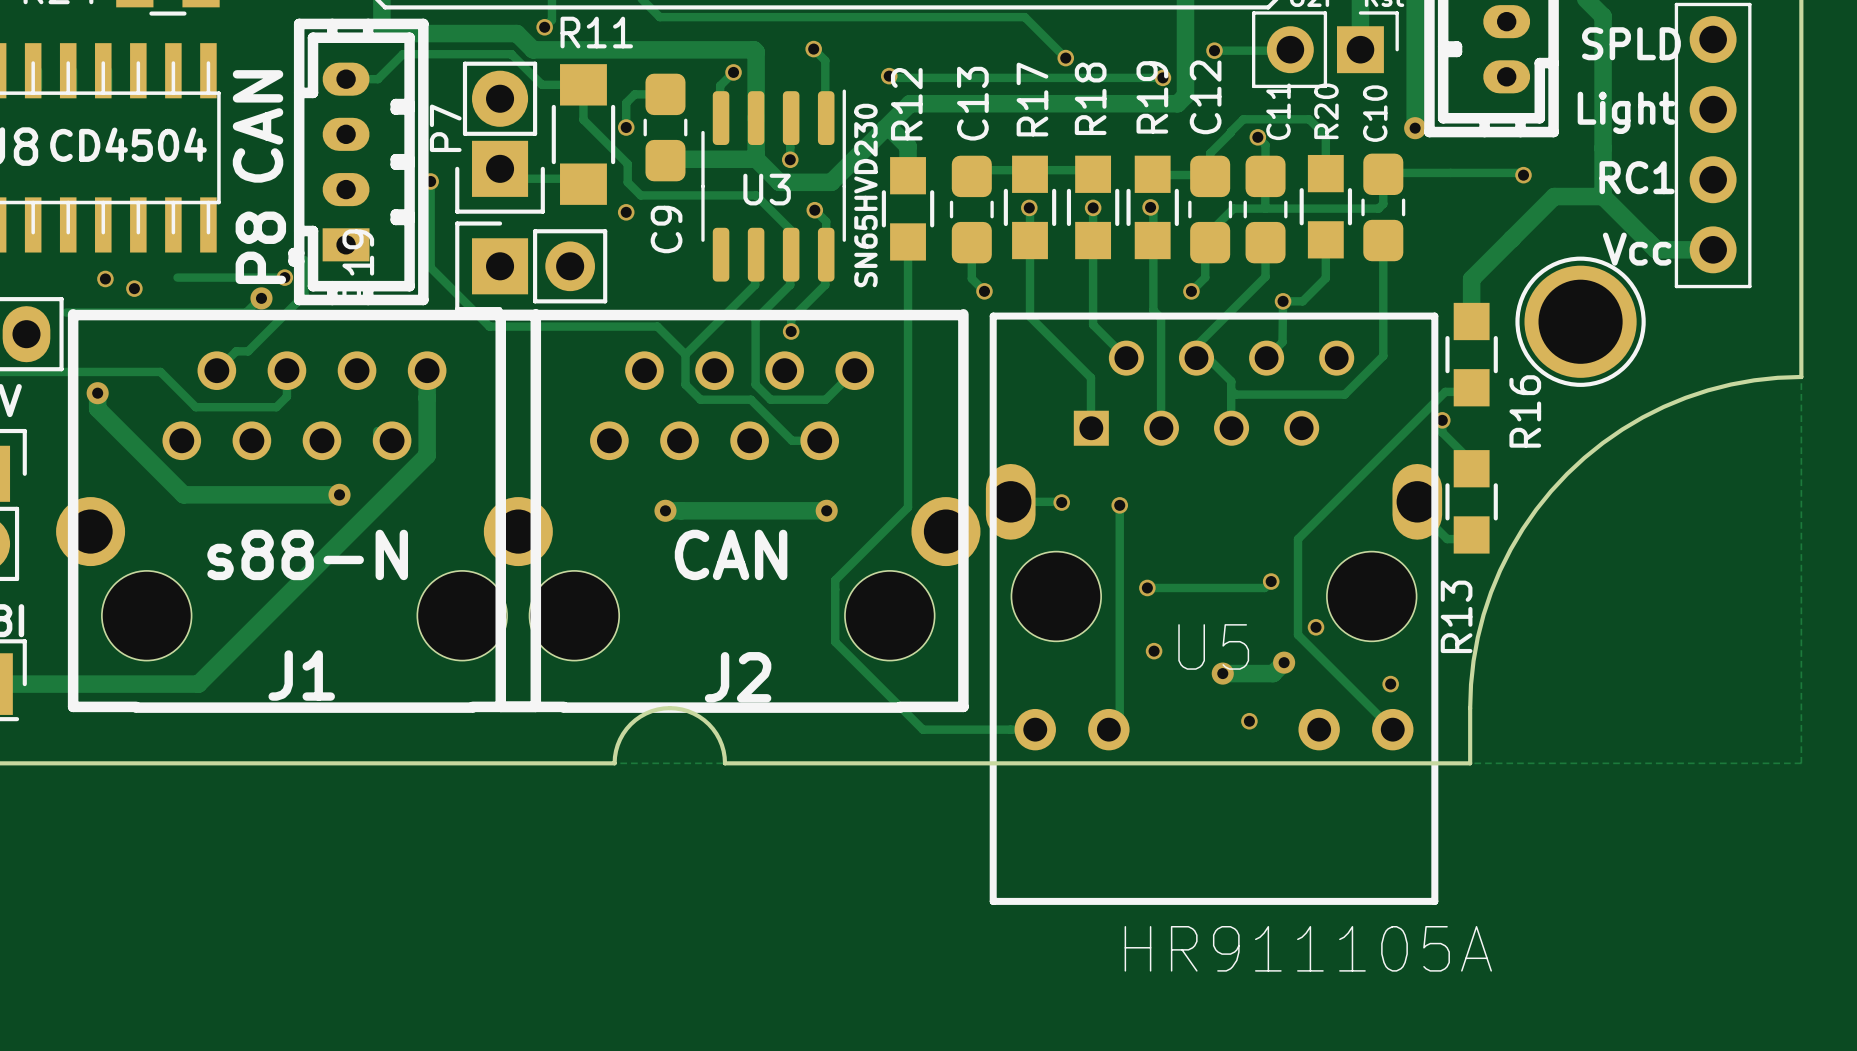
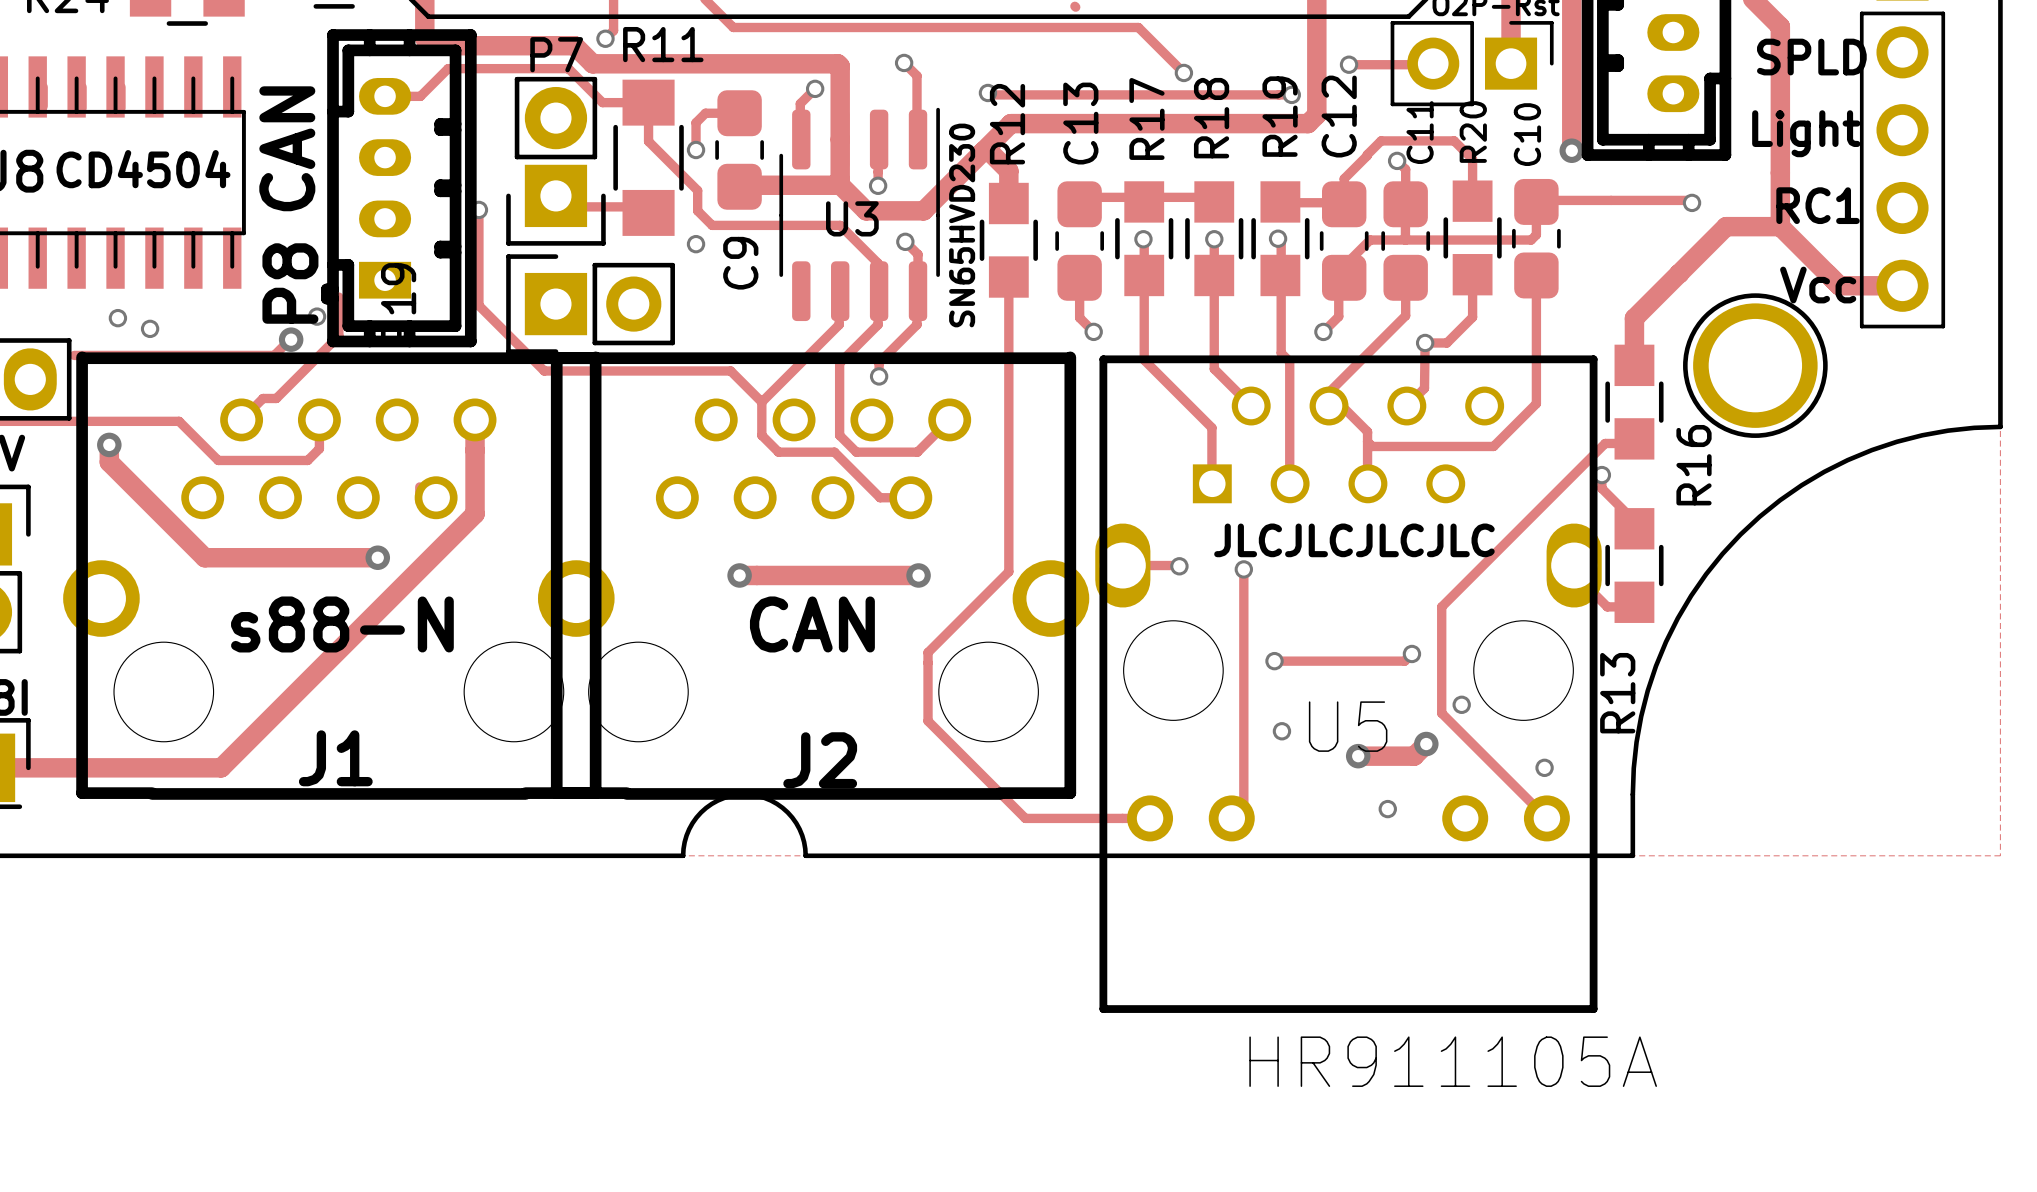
P7 name rotation: 0° (445, 128) -> 90° clockwise (556, 54)
P7 name position: P7 (445, 128) -> P7 (556, 54)
track: (177, 277) (284, 277) -> none
text: none -> JLCJLCJLCJLC (1354, 540)

